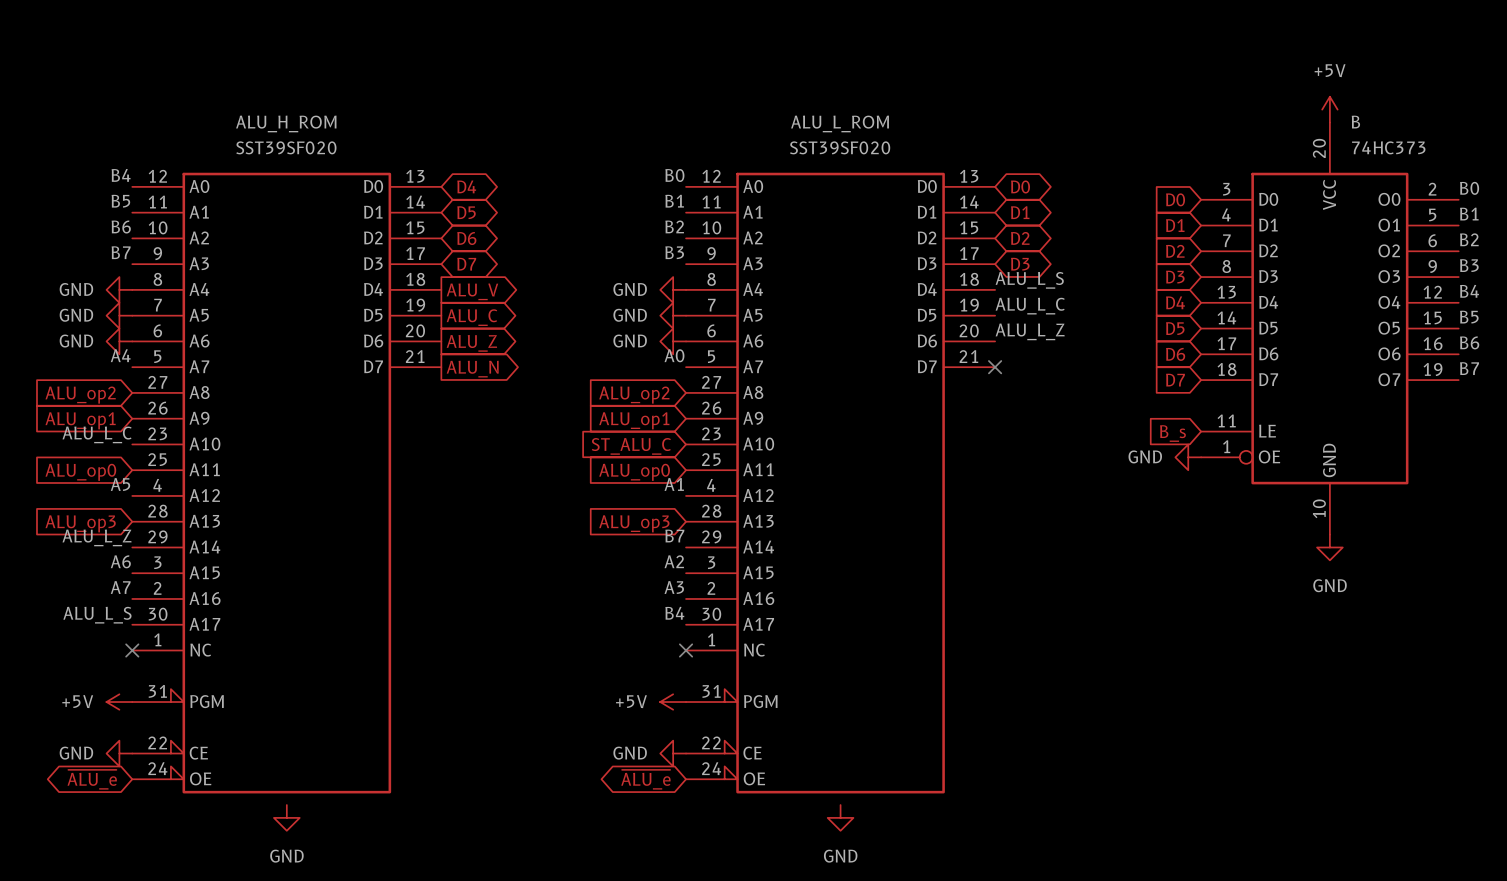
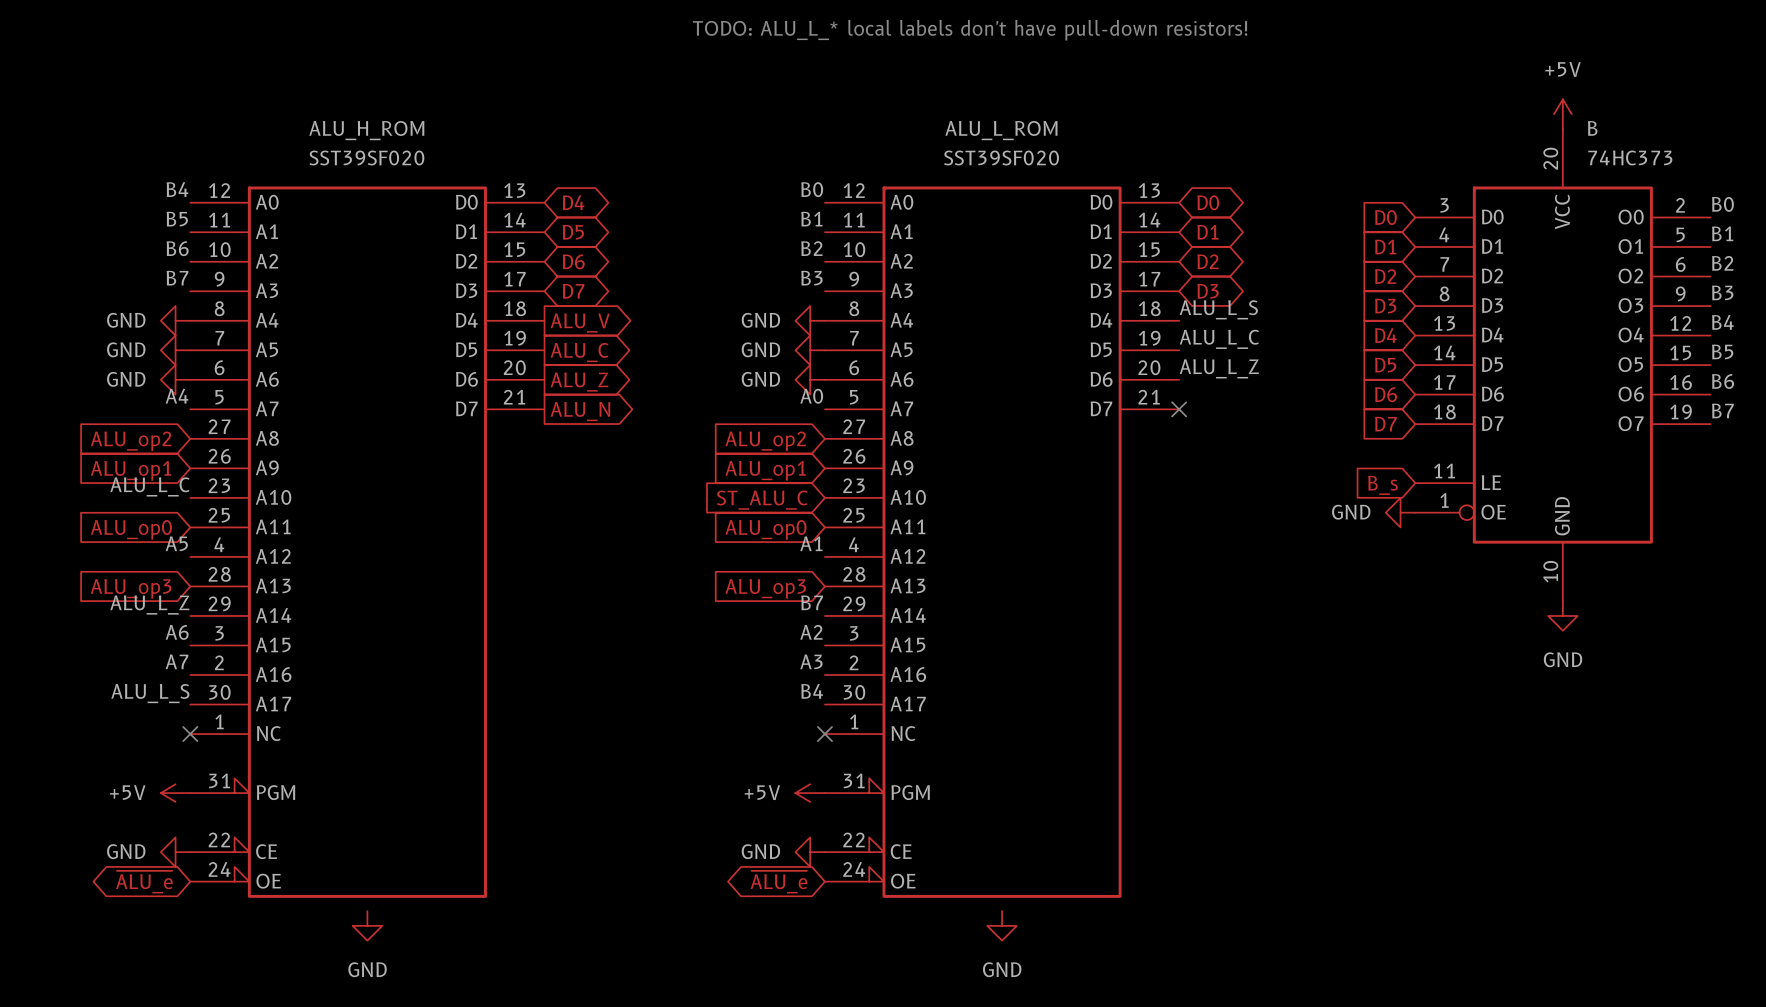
text: none -> TODO: ALU_L_* local labels don't have pull-down resistors! (970, 30)

